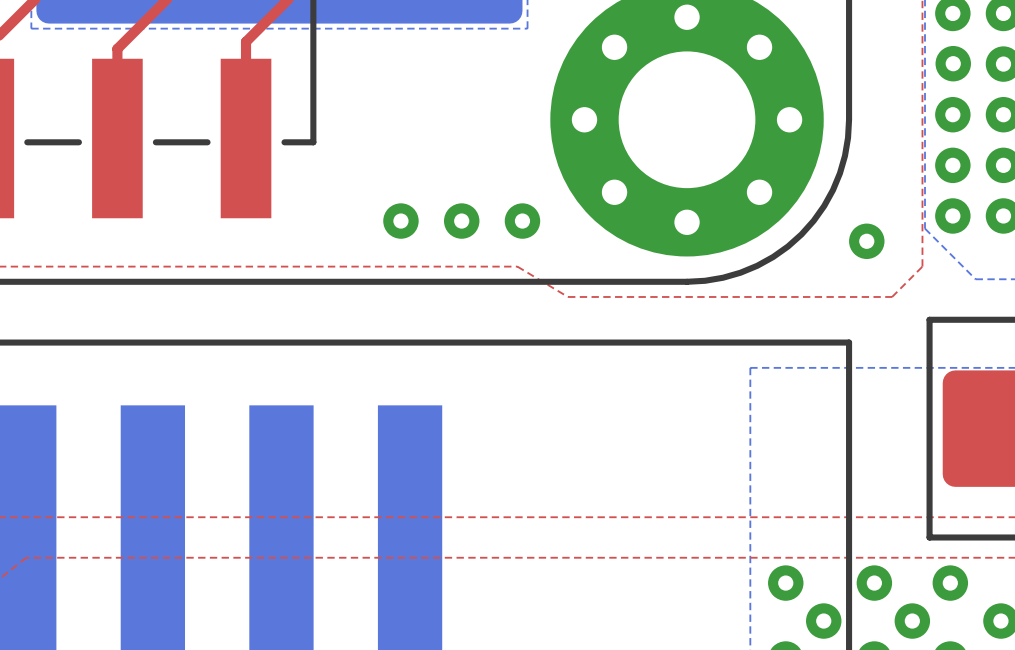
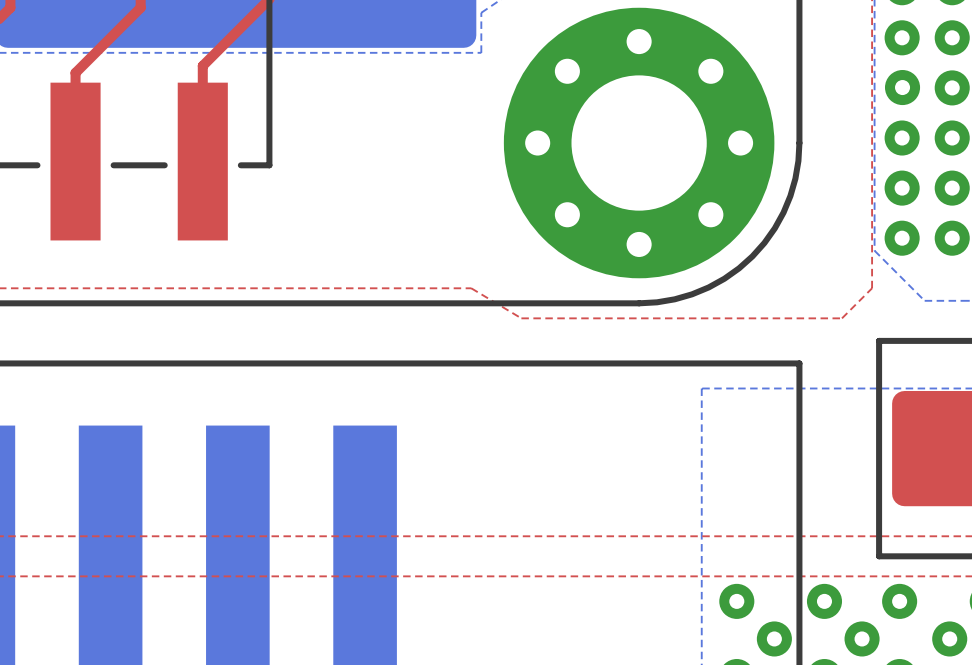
via: (400, 221) -> none
via: (461, 221) -> none
via: (522, 221) -> none
via: (866, 241) -> none

